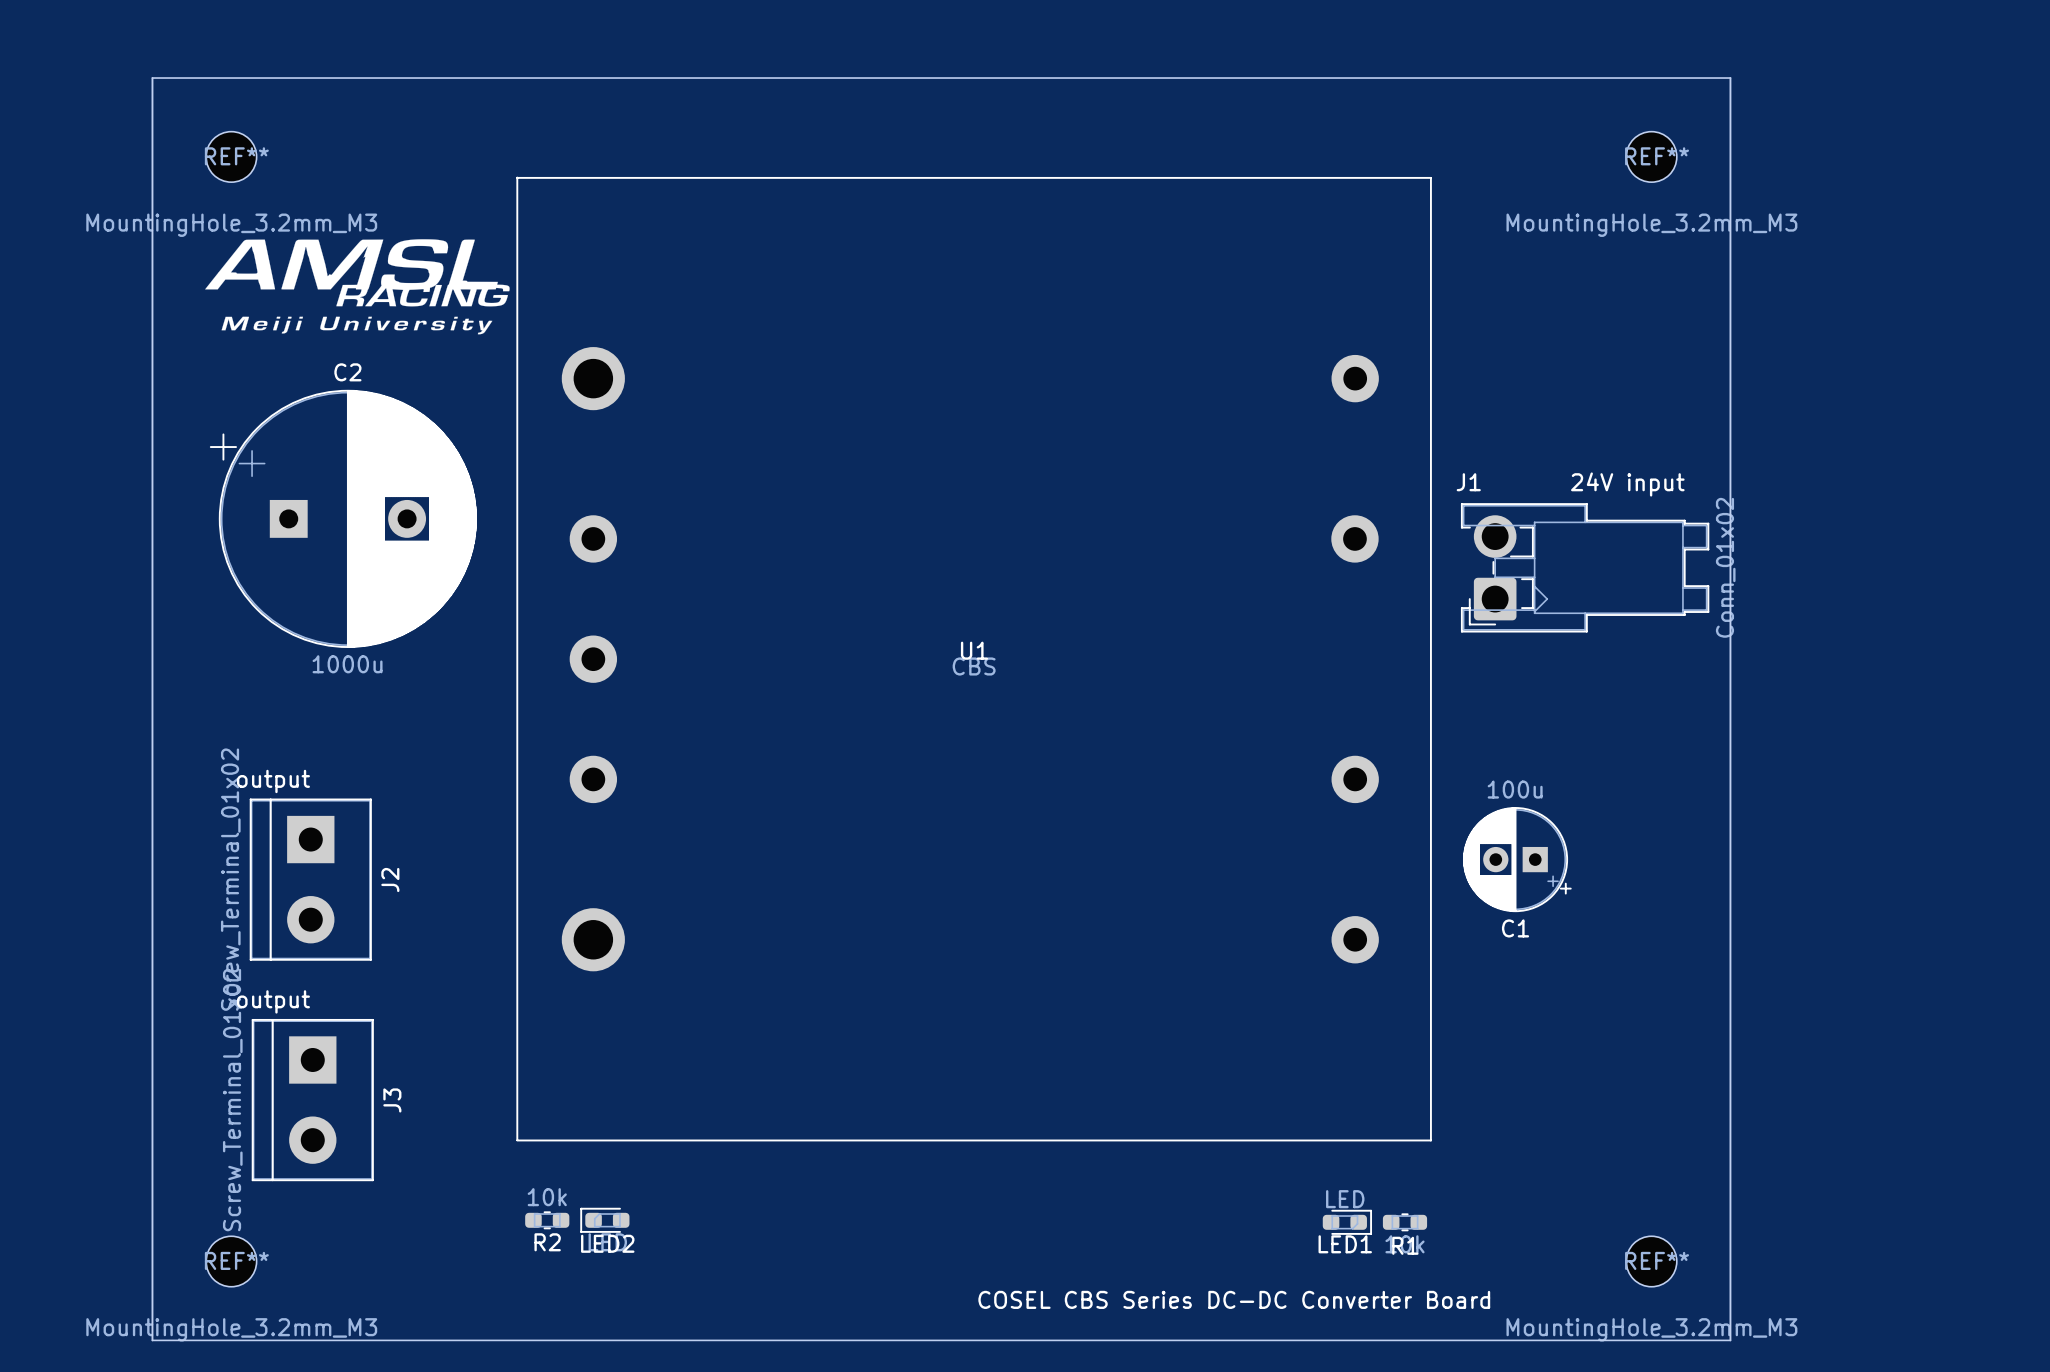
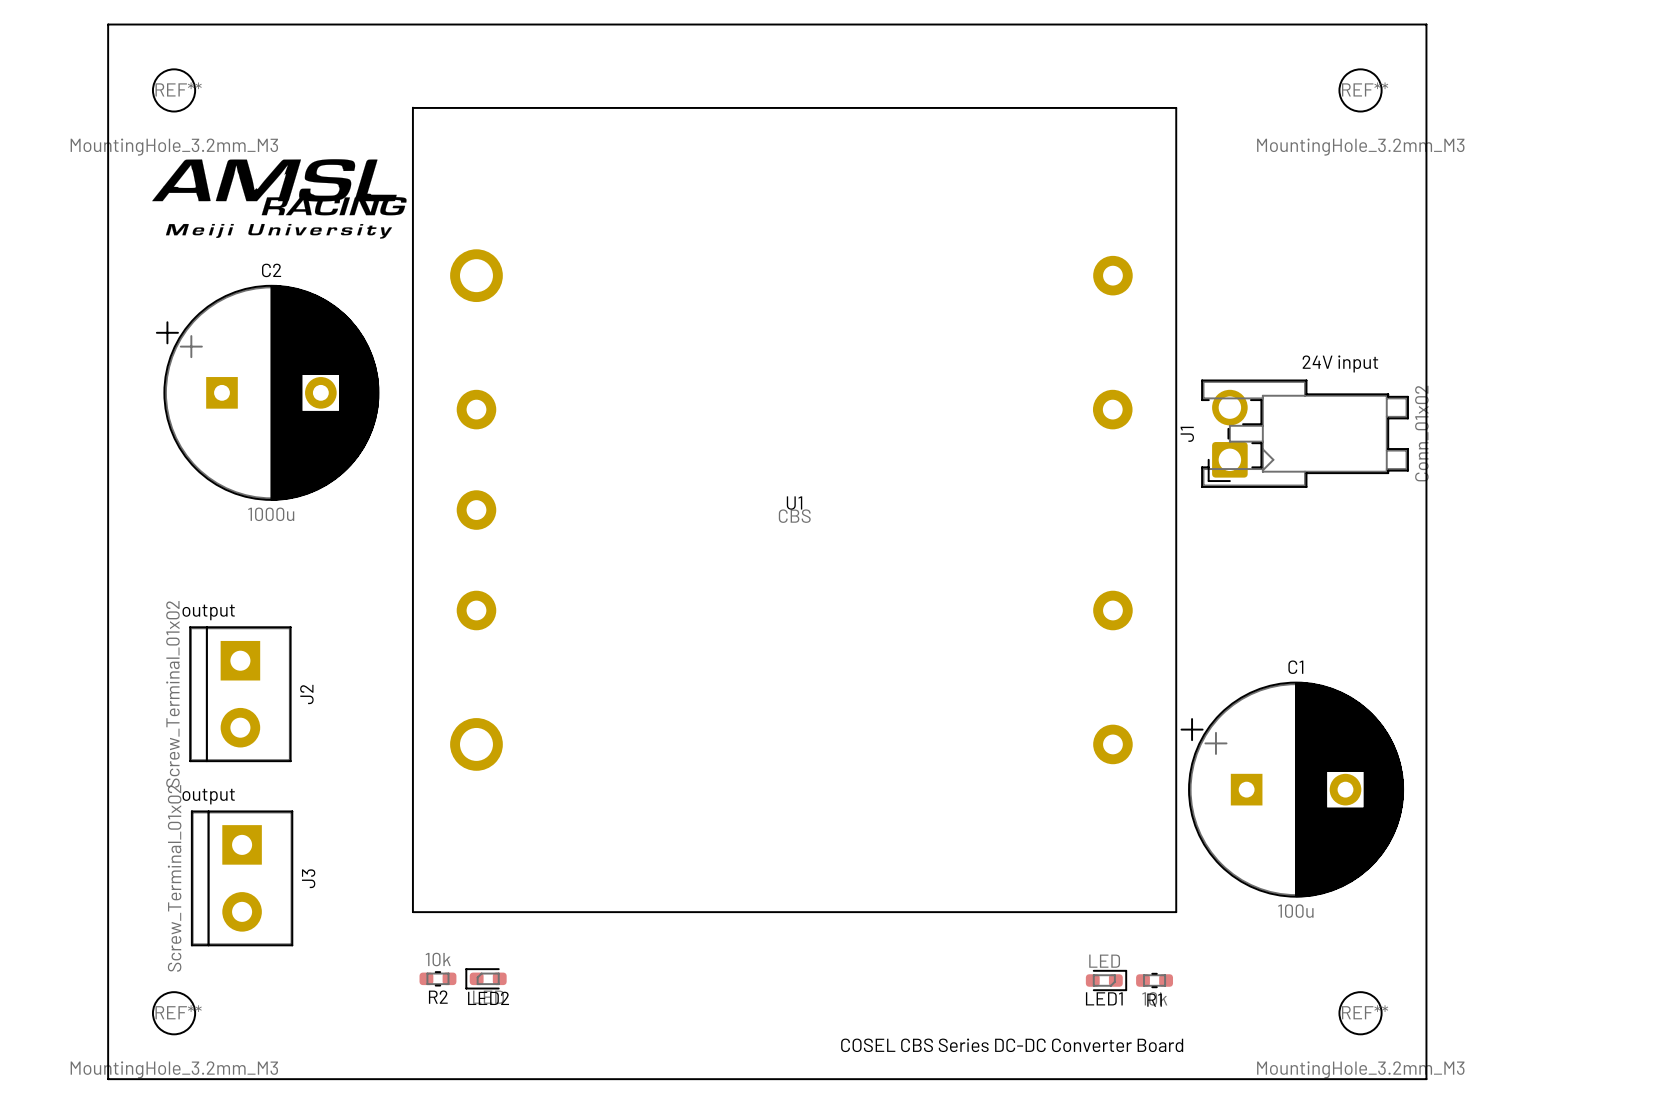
J1 name rotation: 0° (1468, 482) -> 90° counterclockwise (1187, 434)
J1 name position: J1 (1468, 482) -> J1 (1187, 434)
C1 value position: 100u (1515, 789) -> 100u (1295, 911)
C1 footprint: [1462, 807, 1572, 913] -> [1180, 681, 1404, 898]
C1 name position: C1 (1515, 928) -> C1 (1295, 667)

